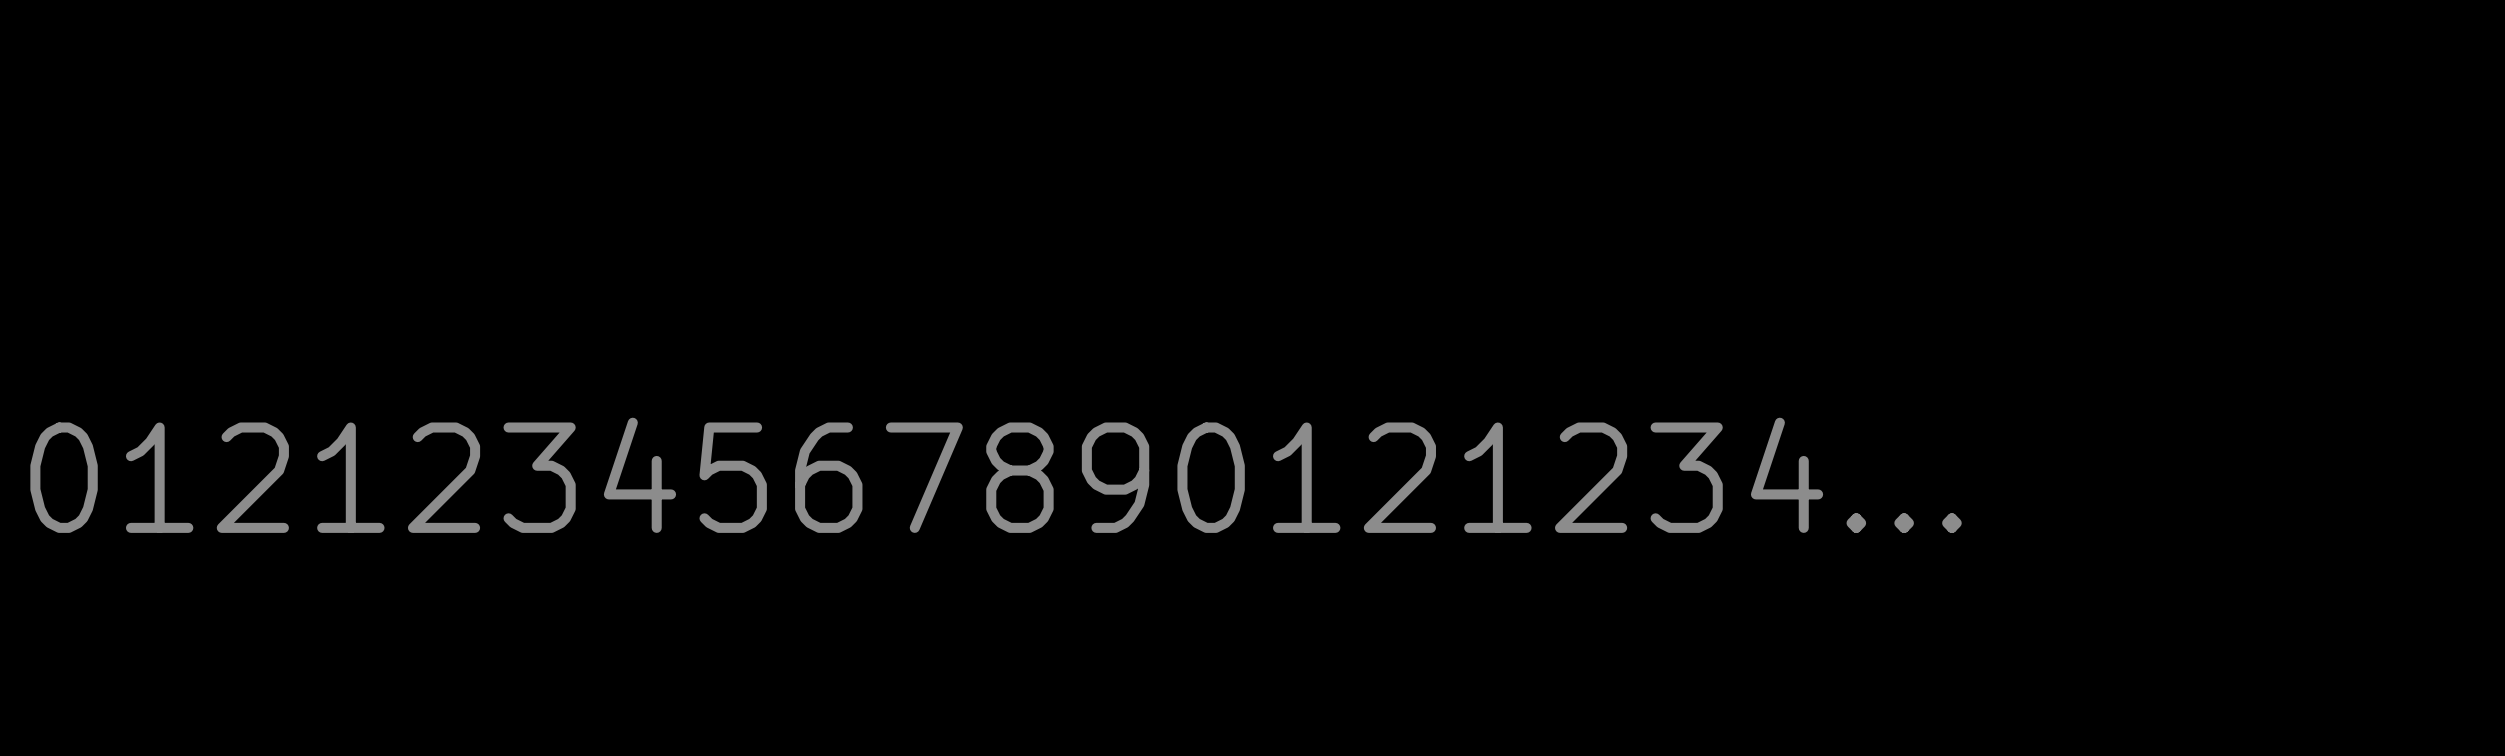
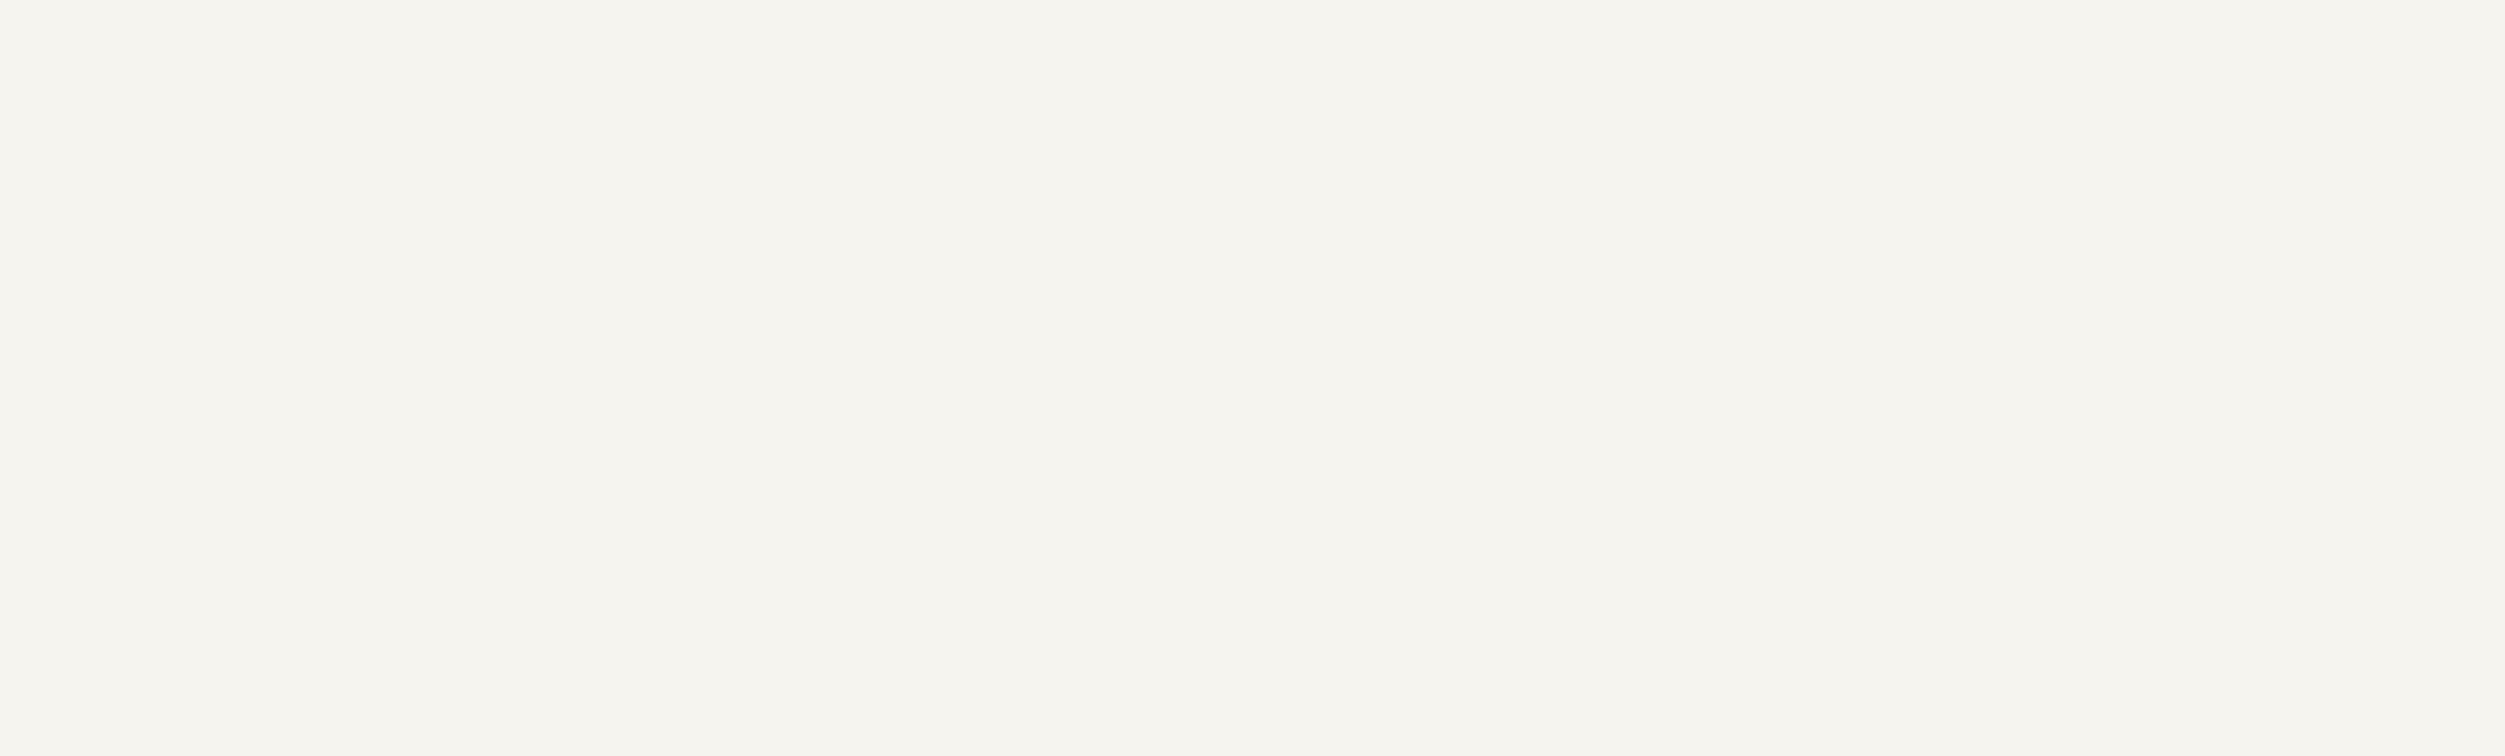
text: 0121234567890121234... (996, 475) -> none

